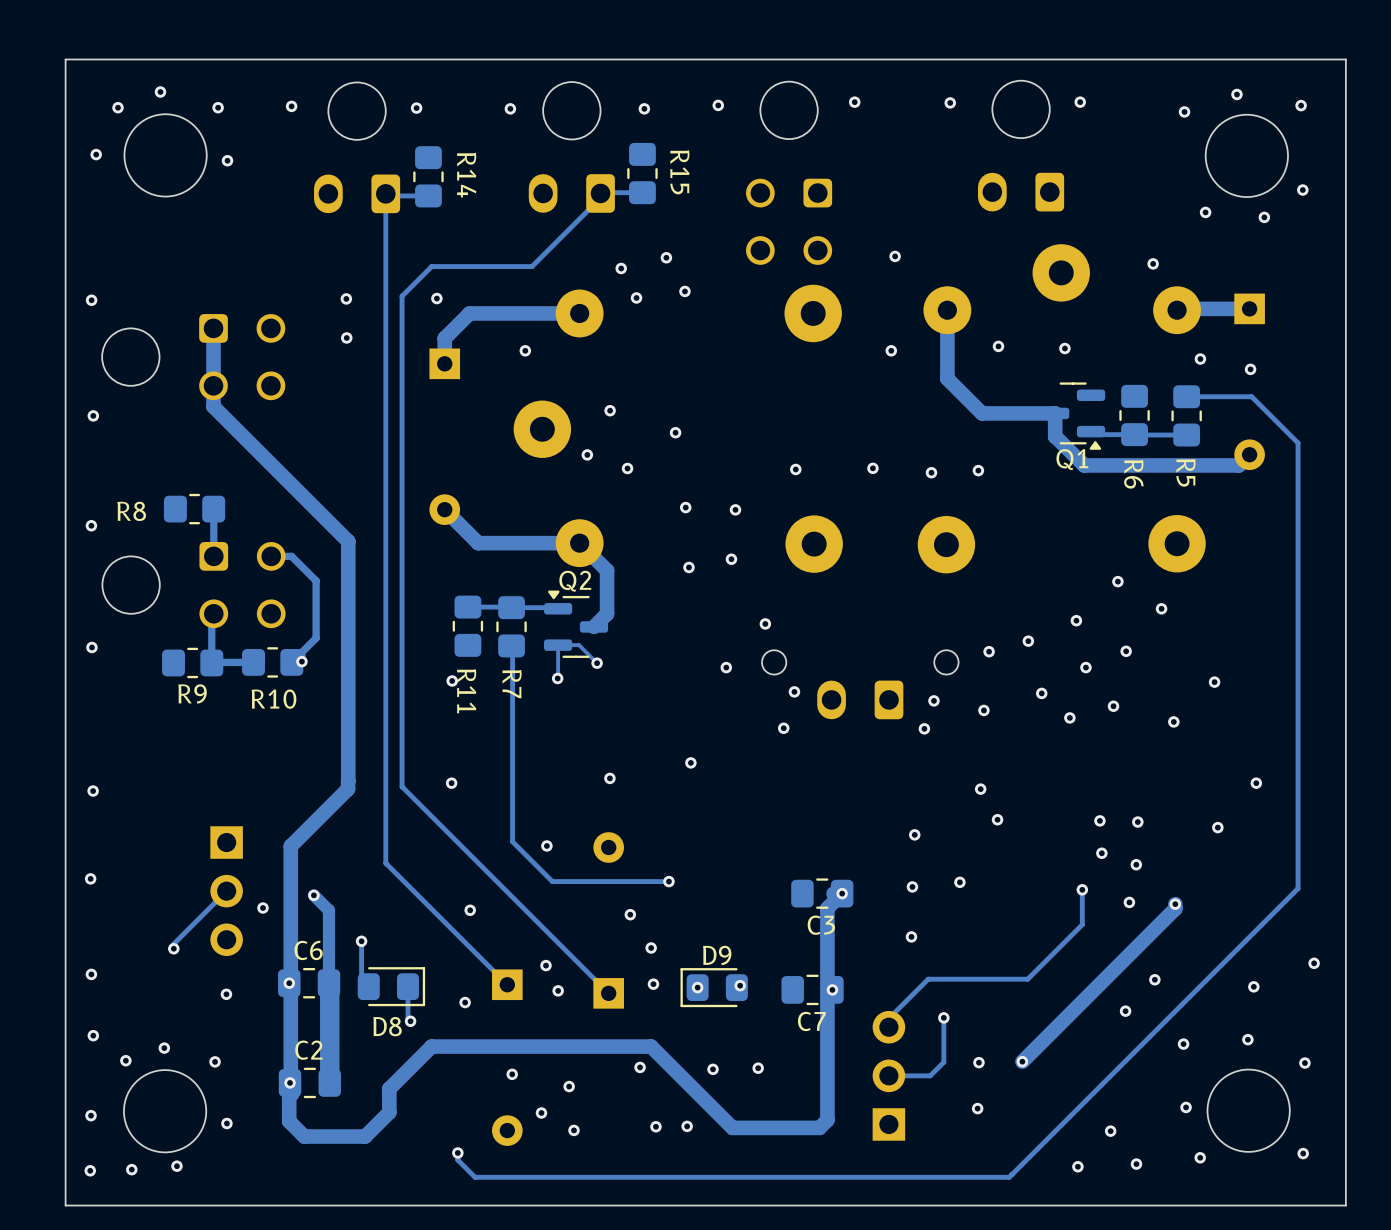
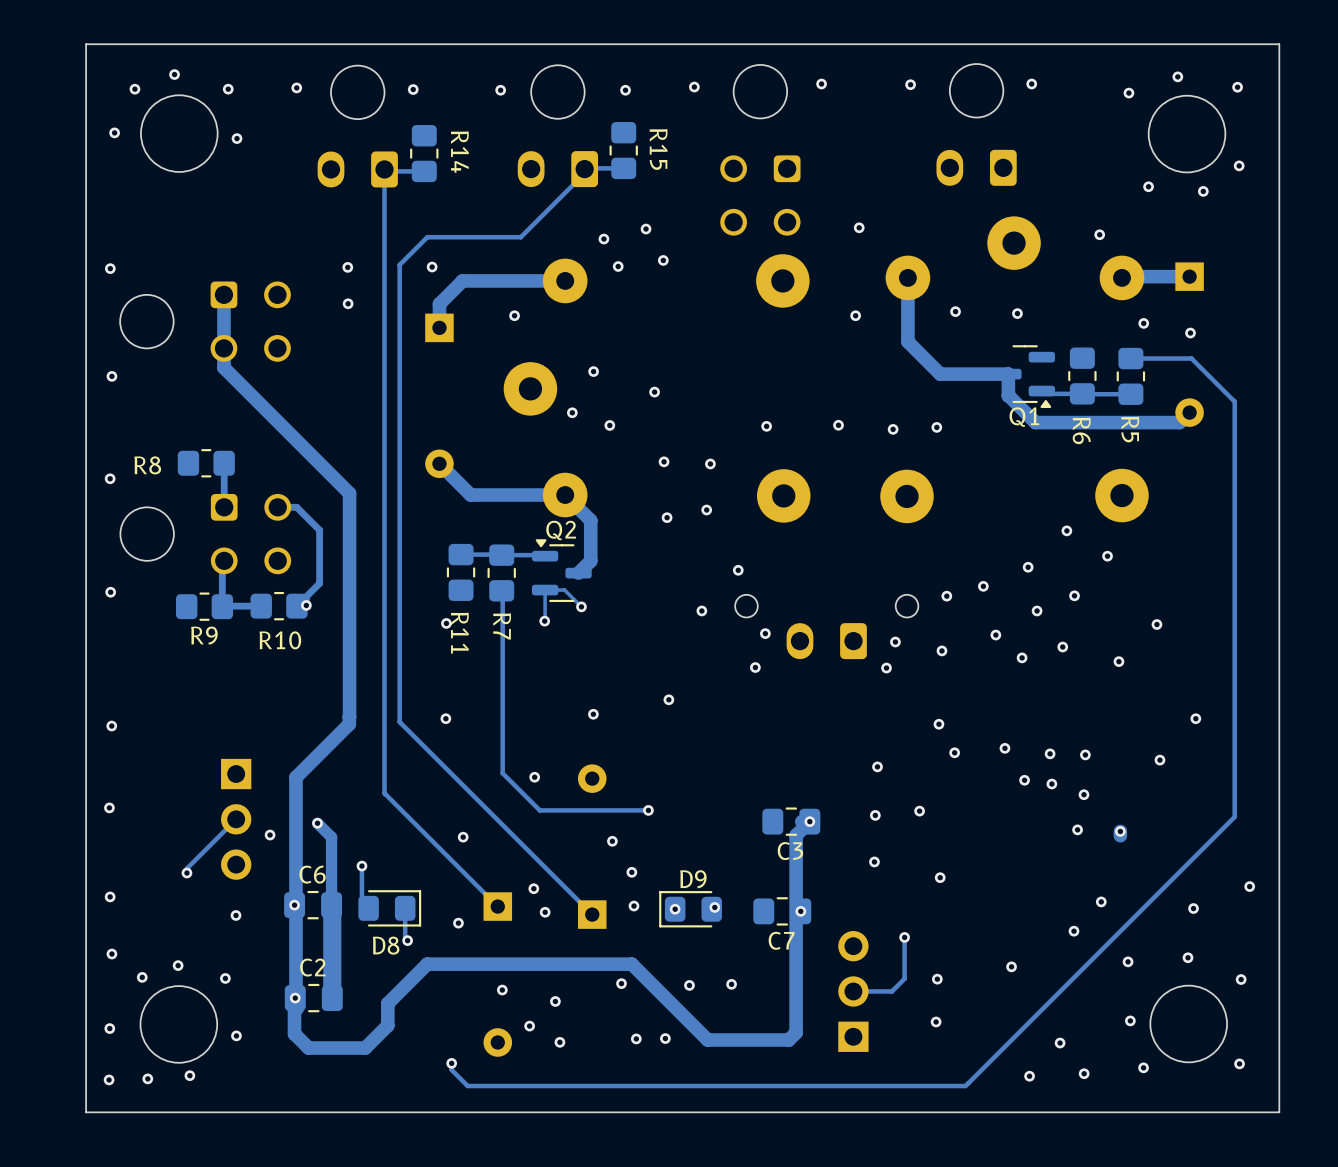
via: none -> (1004, 748)
via: none -> (1024, 780)
track: (1082, 889) (1082, 924) (1027, 979) (928, 979) (888, 1018) (888, 1027) -> none
via: (1082, 889) -> none
track: (1175, 908) (1022, 1061) -> none
via: none -> (940, 877)
via position: (1022, 1061) -> (1011, 966)

